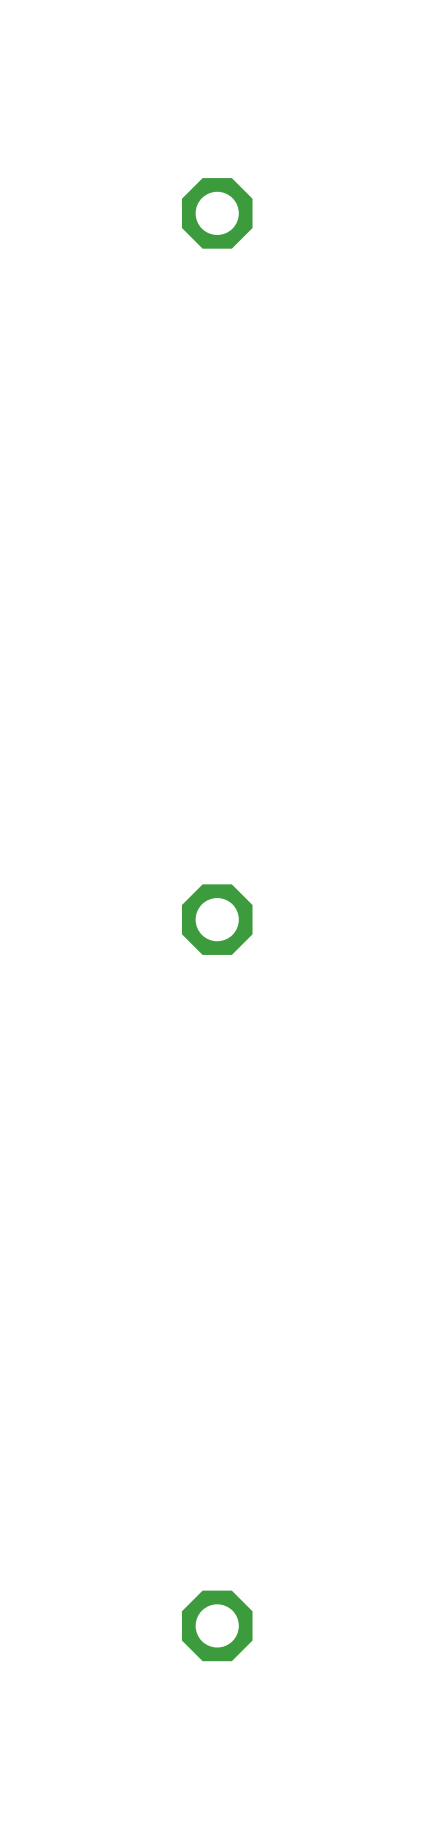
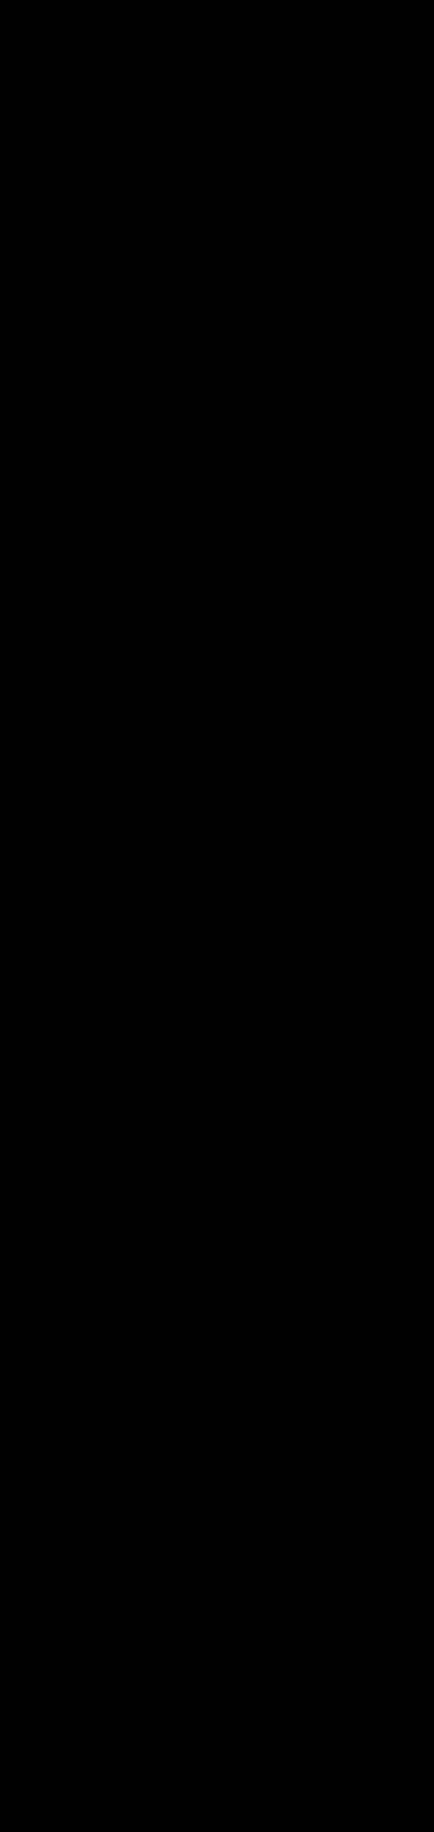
part: (217, 213) -> none
part: (217, 919) -> none
part: (217, 1625) -> none

